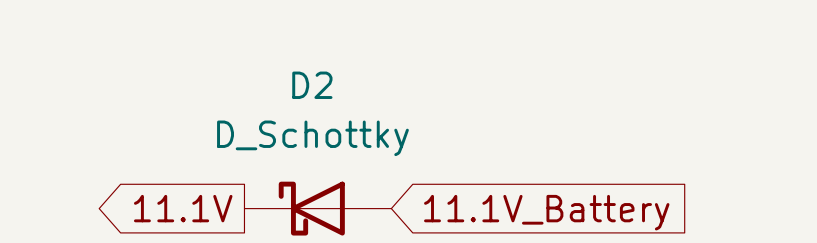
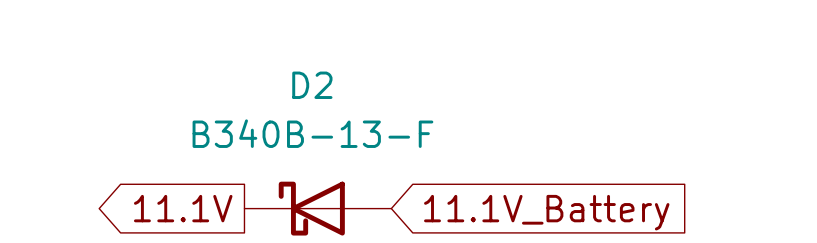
D2 value: D_Schottky (312, 138) -> B340B-13-F (312, 133)

